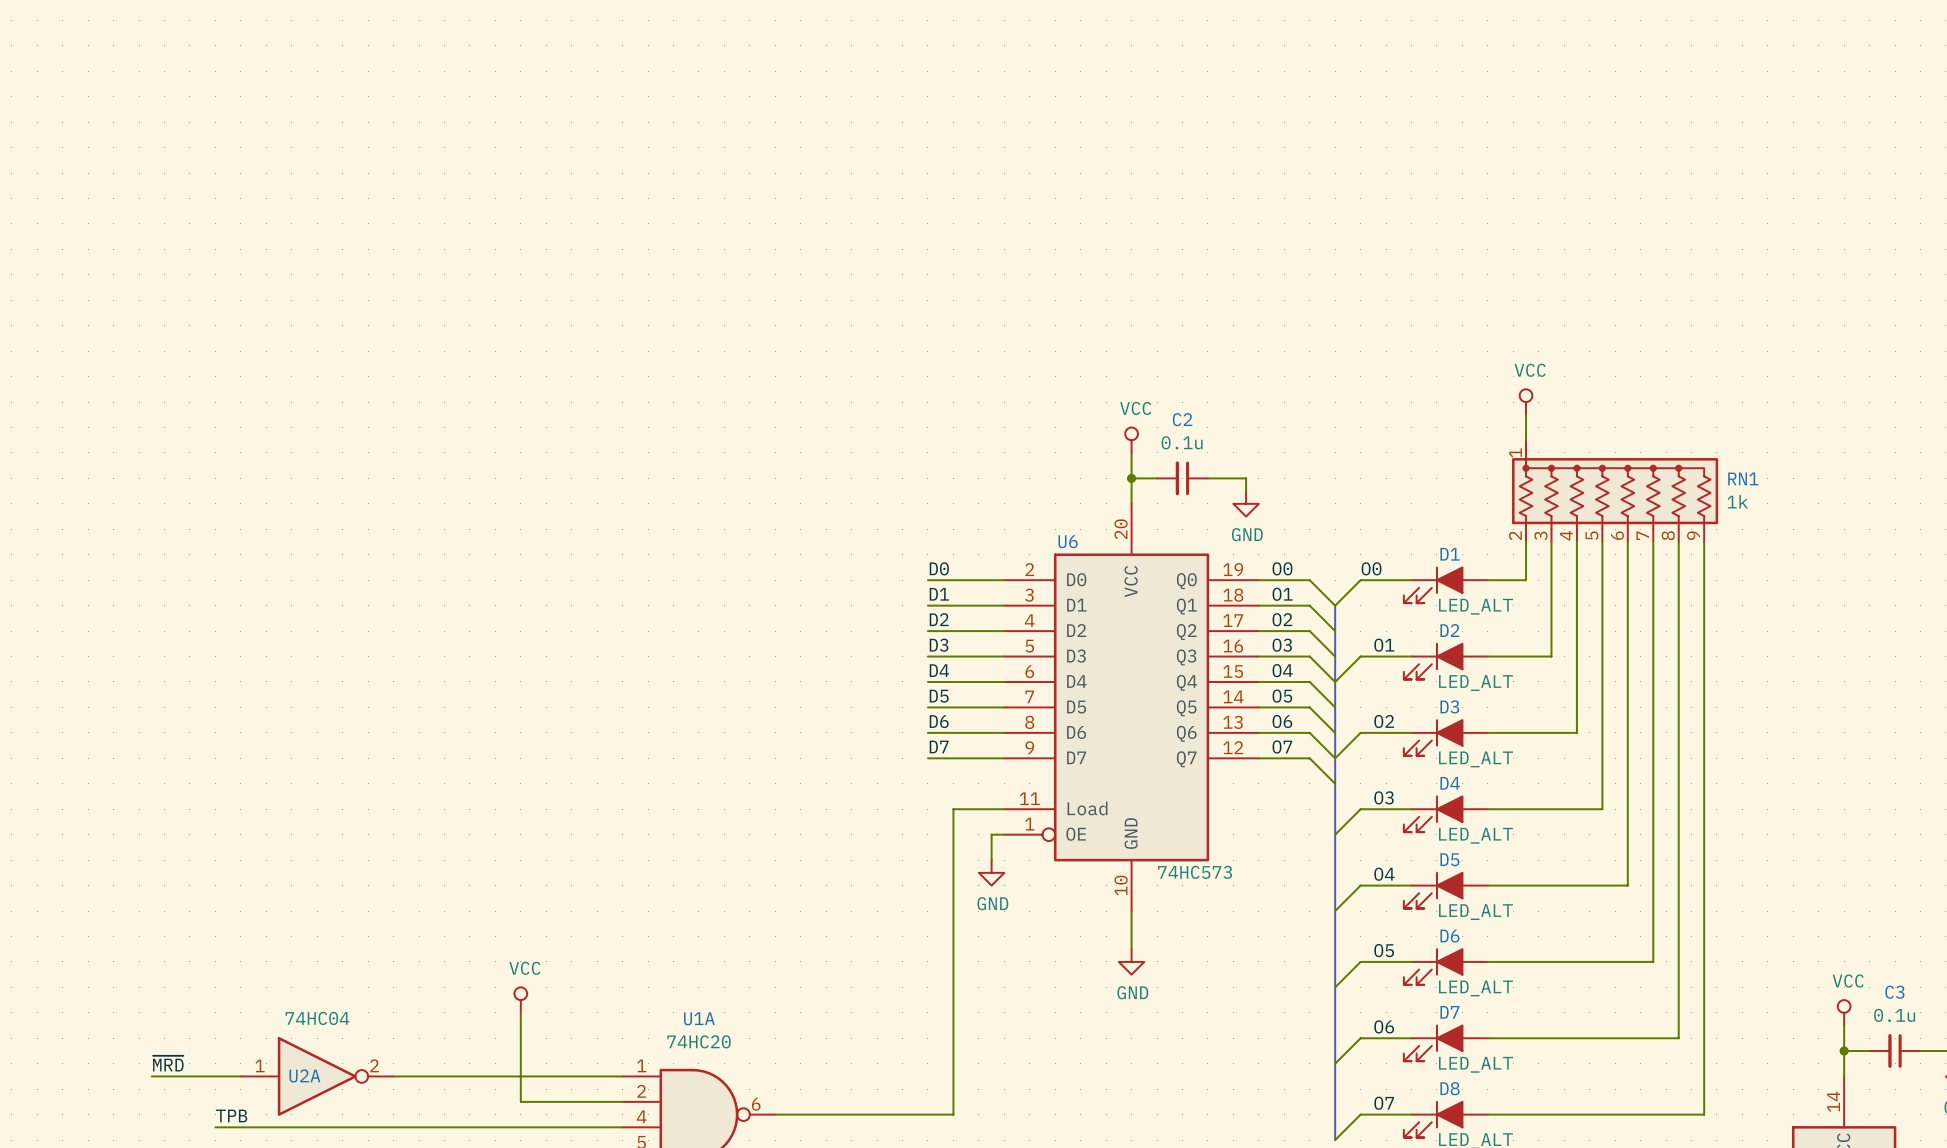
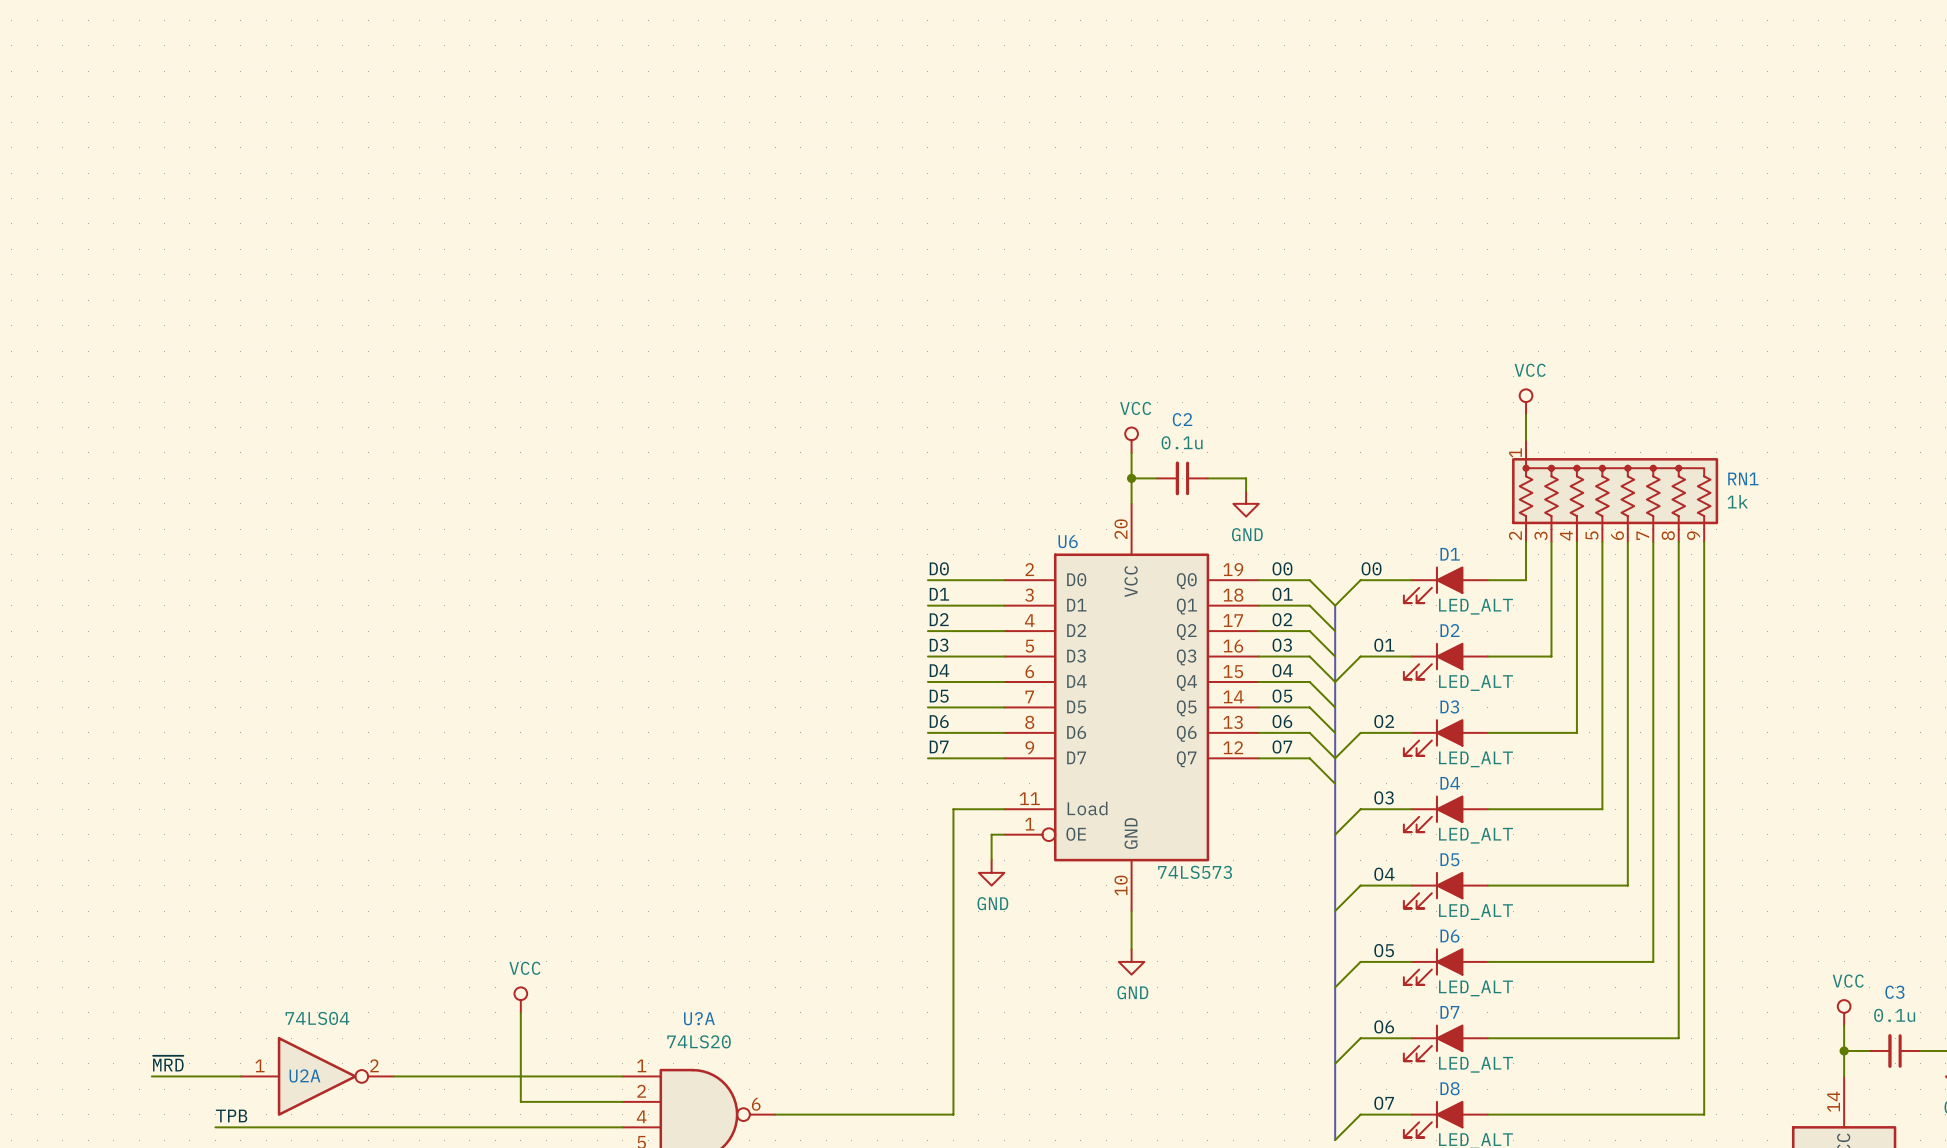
U6 value: 74HC573 (1195, 872) -> 74LS573 (1195, 872)
U2A value: 74HC04 (317, 1018) -> 74LS04 (317, 1018)
U1A name: U1A (699, 1018) -> U?A (699, 1018)
U1A value: 74HC20 (699, 1041) -> 74LS20 (699, 1041)

